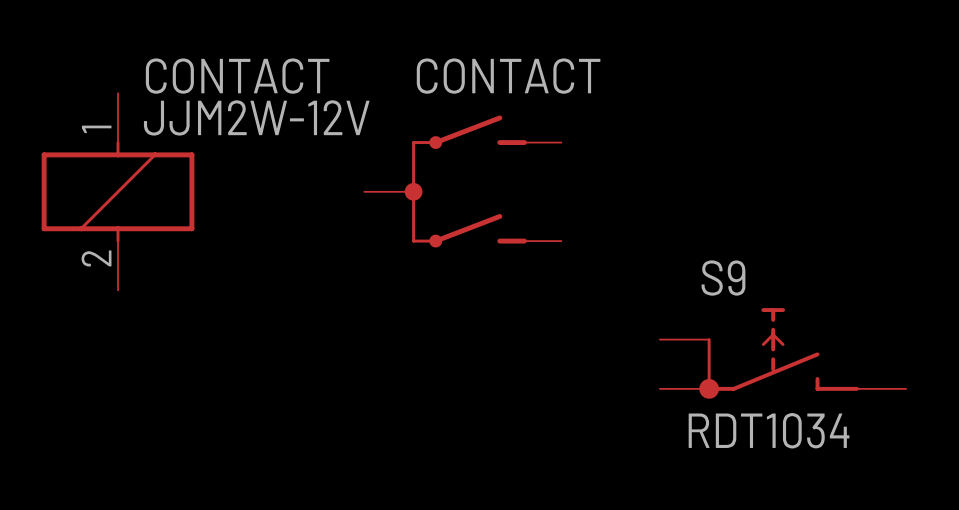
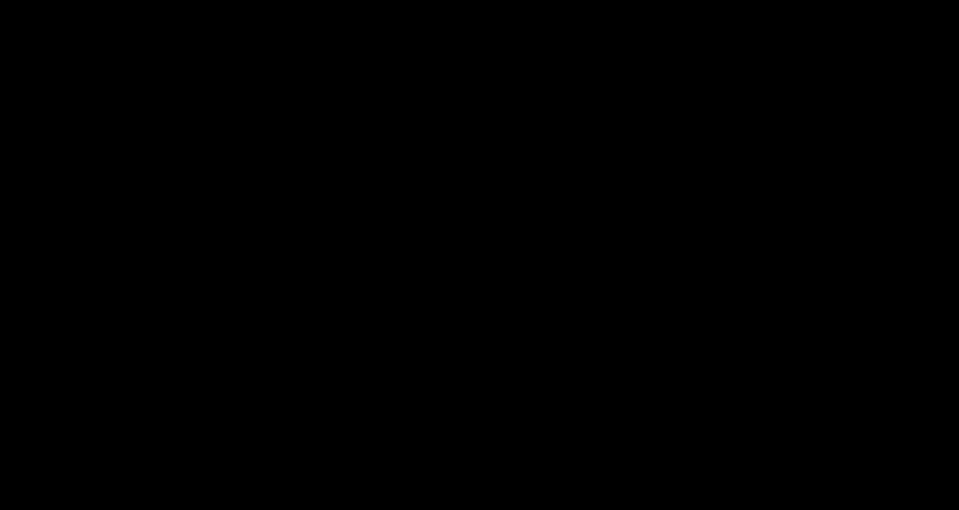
CONTACT: (462, 181) -> none
CONTACT: JJM2W-12V (118, 191) -> none
S9: RDT1034 (783, 353) -> none

